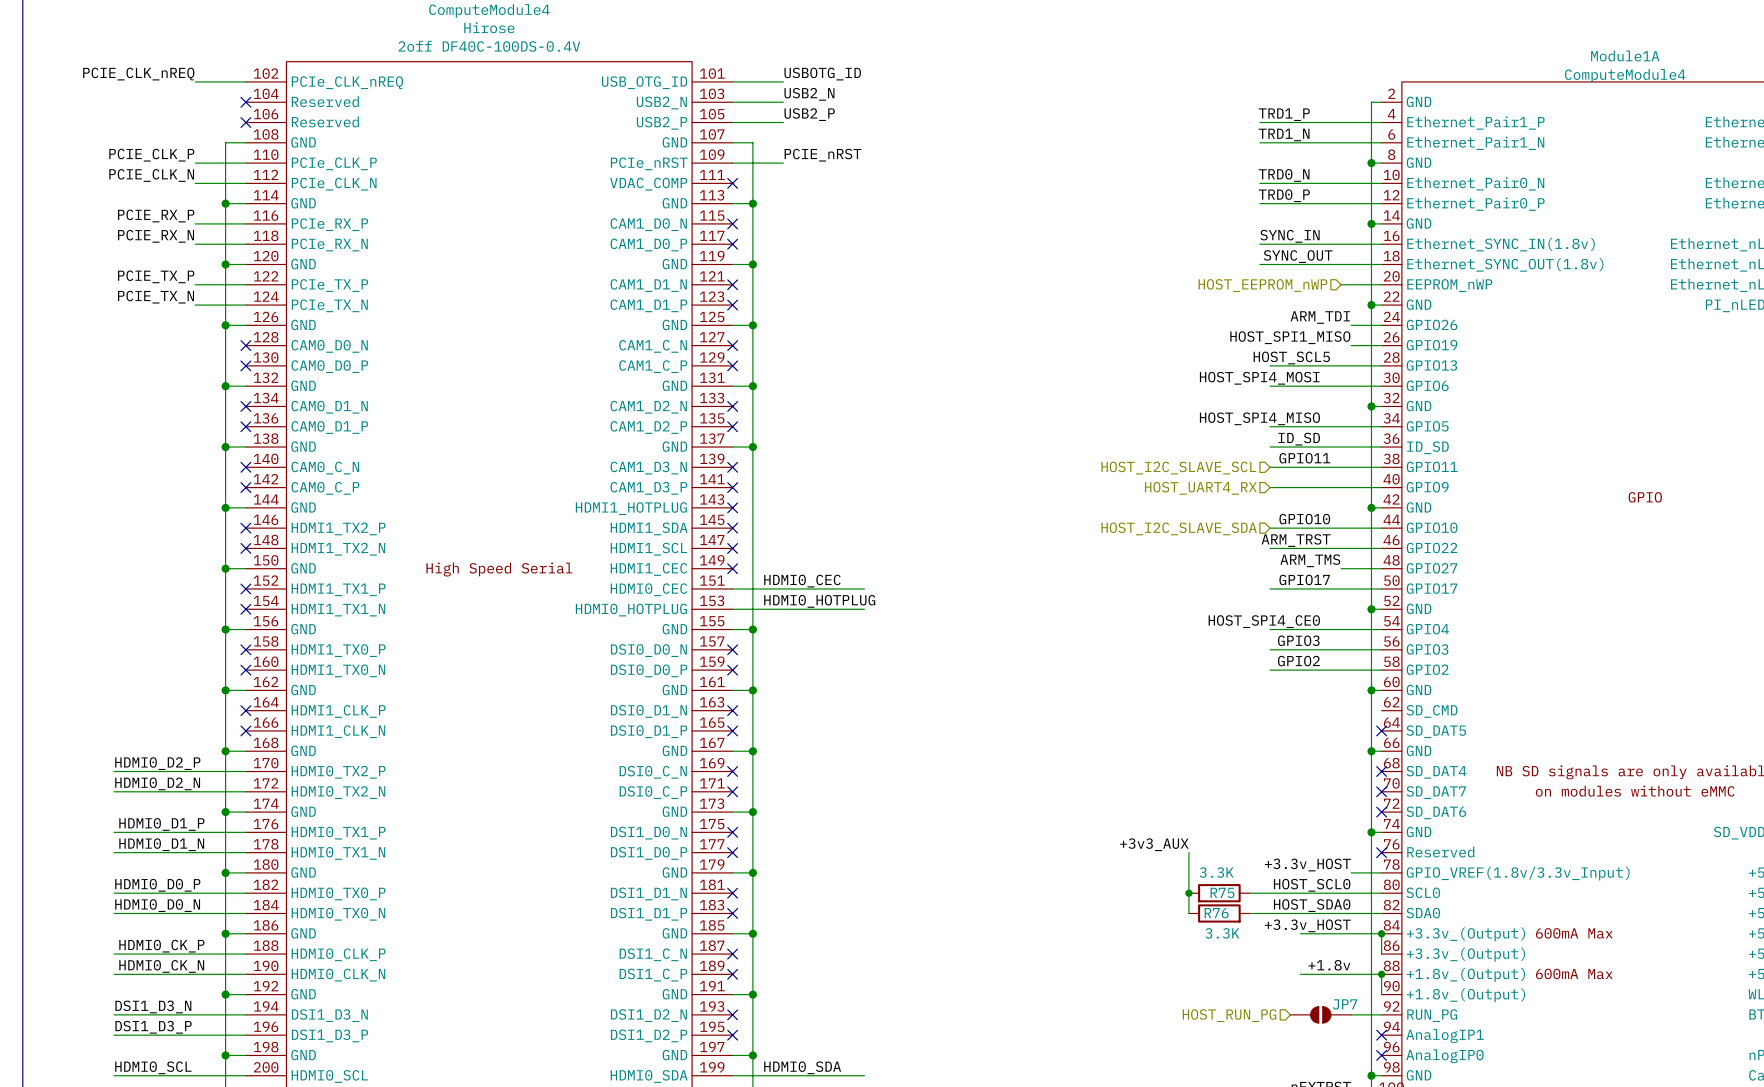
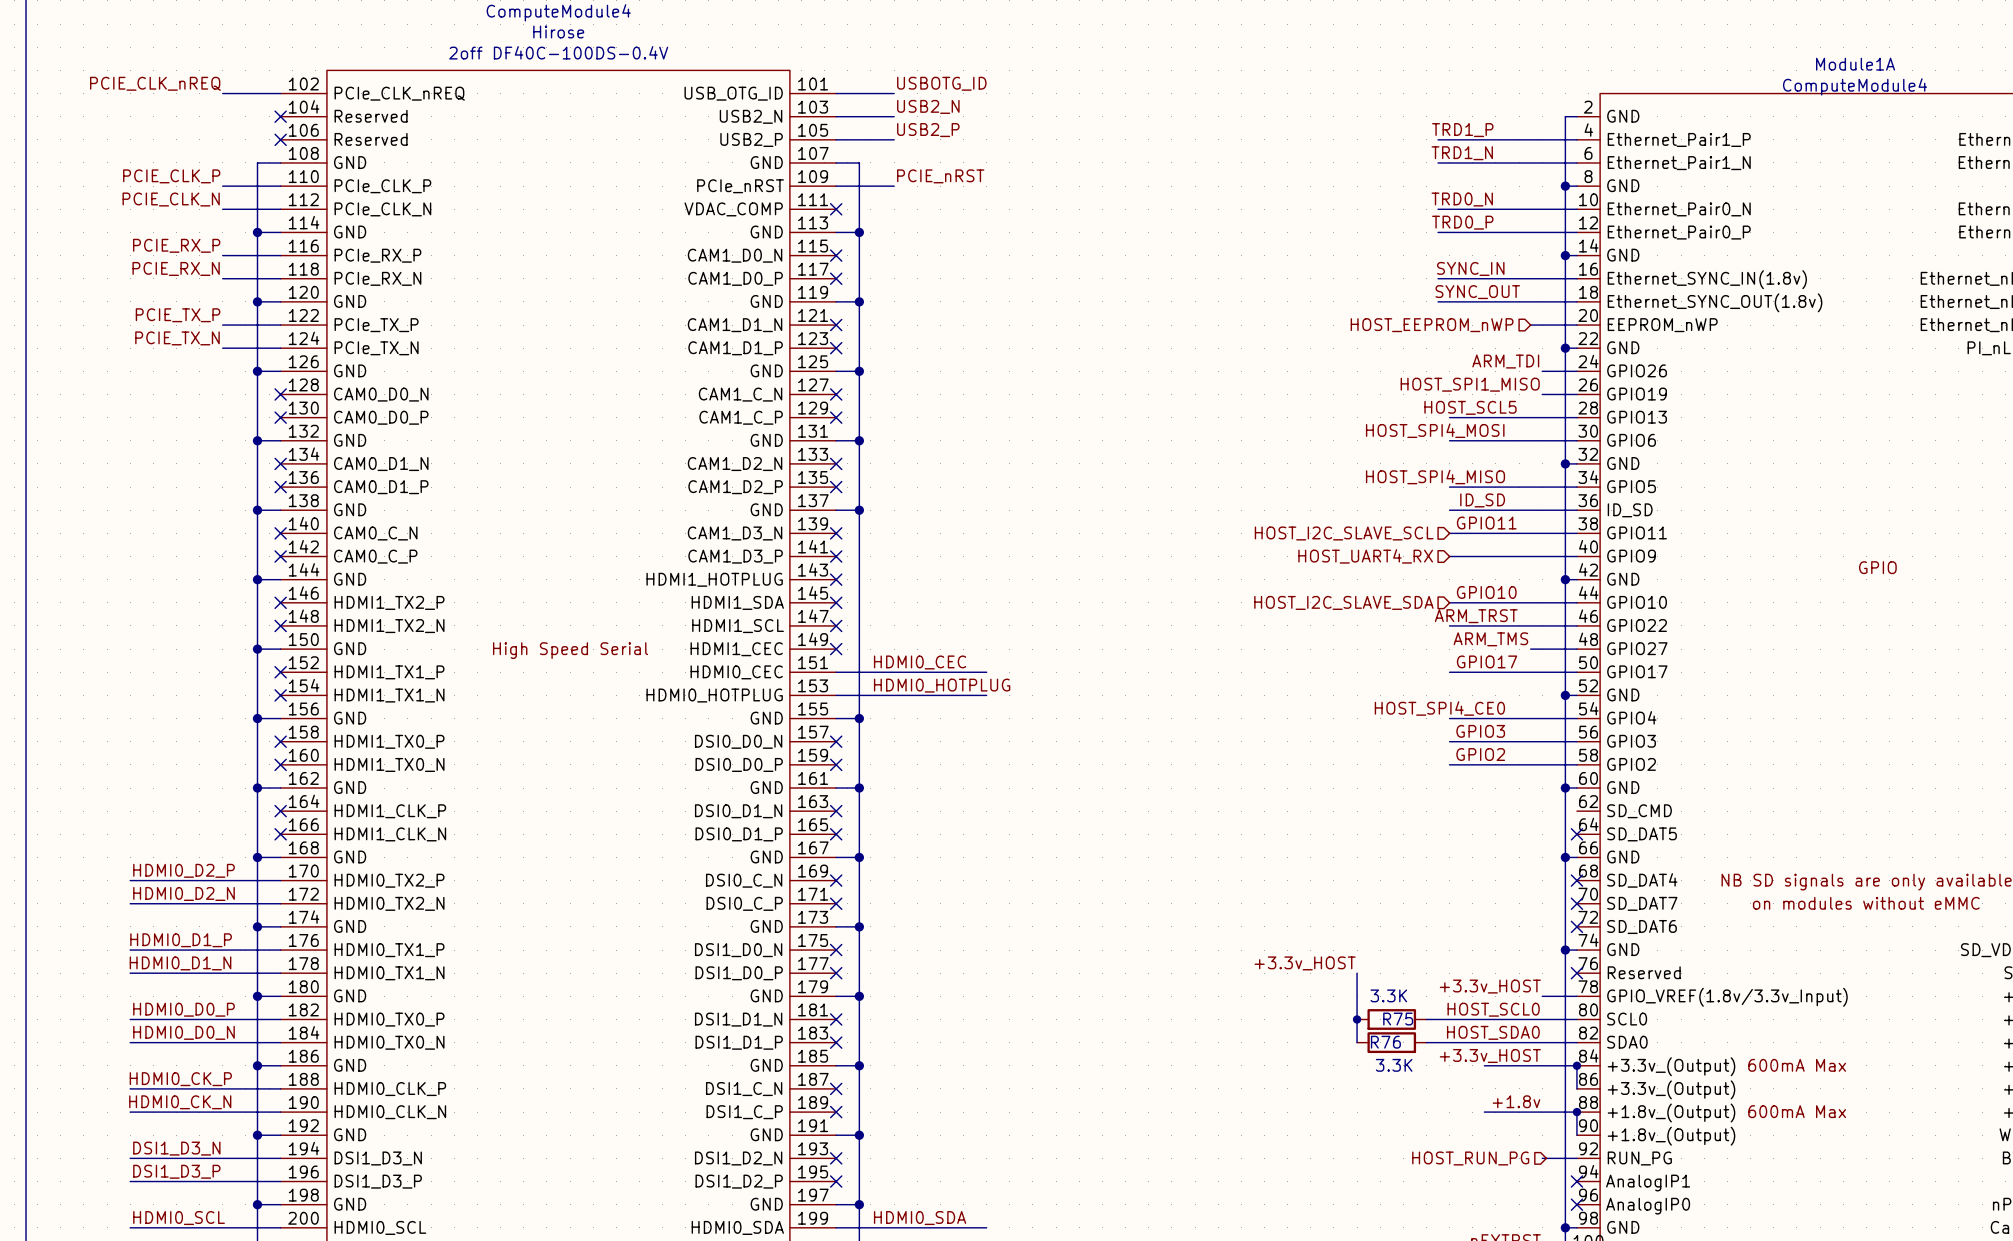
label: +3v3_AUX (1154, 844) -> +3.3v_HOST (1305, 963)
JP7: (1320, 1014) -> none
hierarchical label position: HOST_RUN_PG (1229, 1015) -> HOST_RUN_PG (1470, 1158)

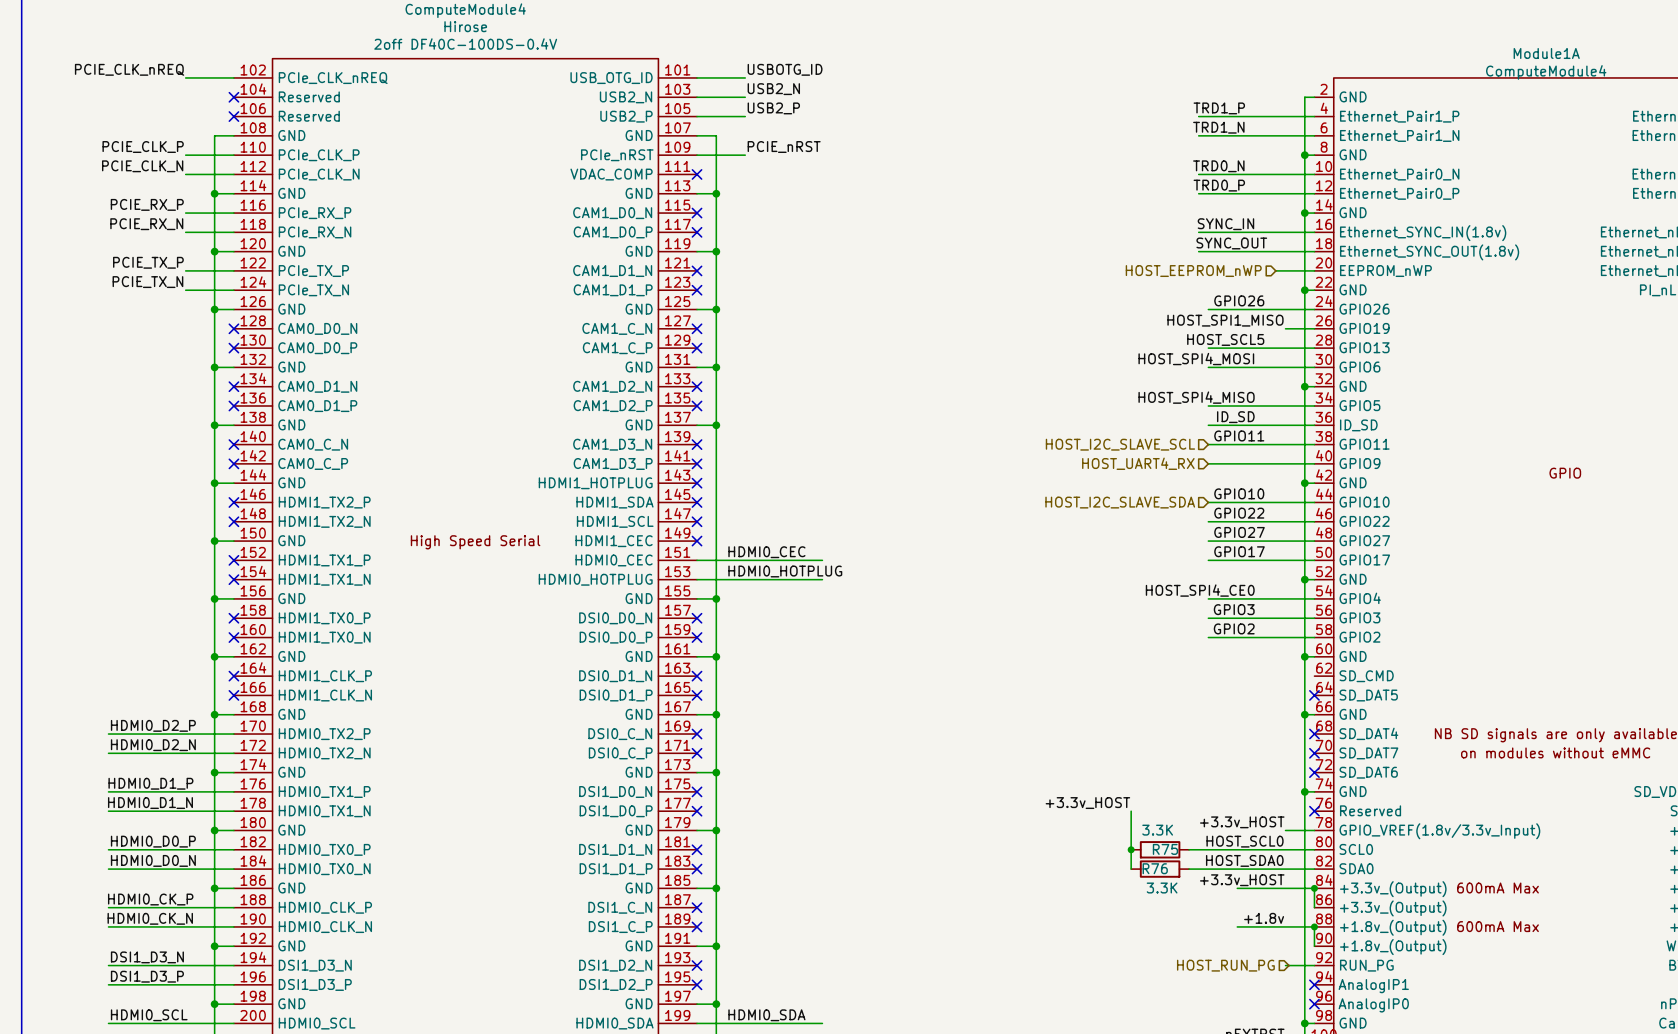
label: none -> GPIO26 (1239, 300)
label: ARM_TDI (1505, 361) -> none
wire: none -> (1208, 309) (1285, 309)
label: ARM_TRST (1476, 616) -> GPIO22 (1239, 513)
label: none -> GPIO27 (1239, 532)
label: ARM_TMS (1490, 639) -> none
wire: none -> (1208, 541) (1275, 541)

